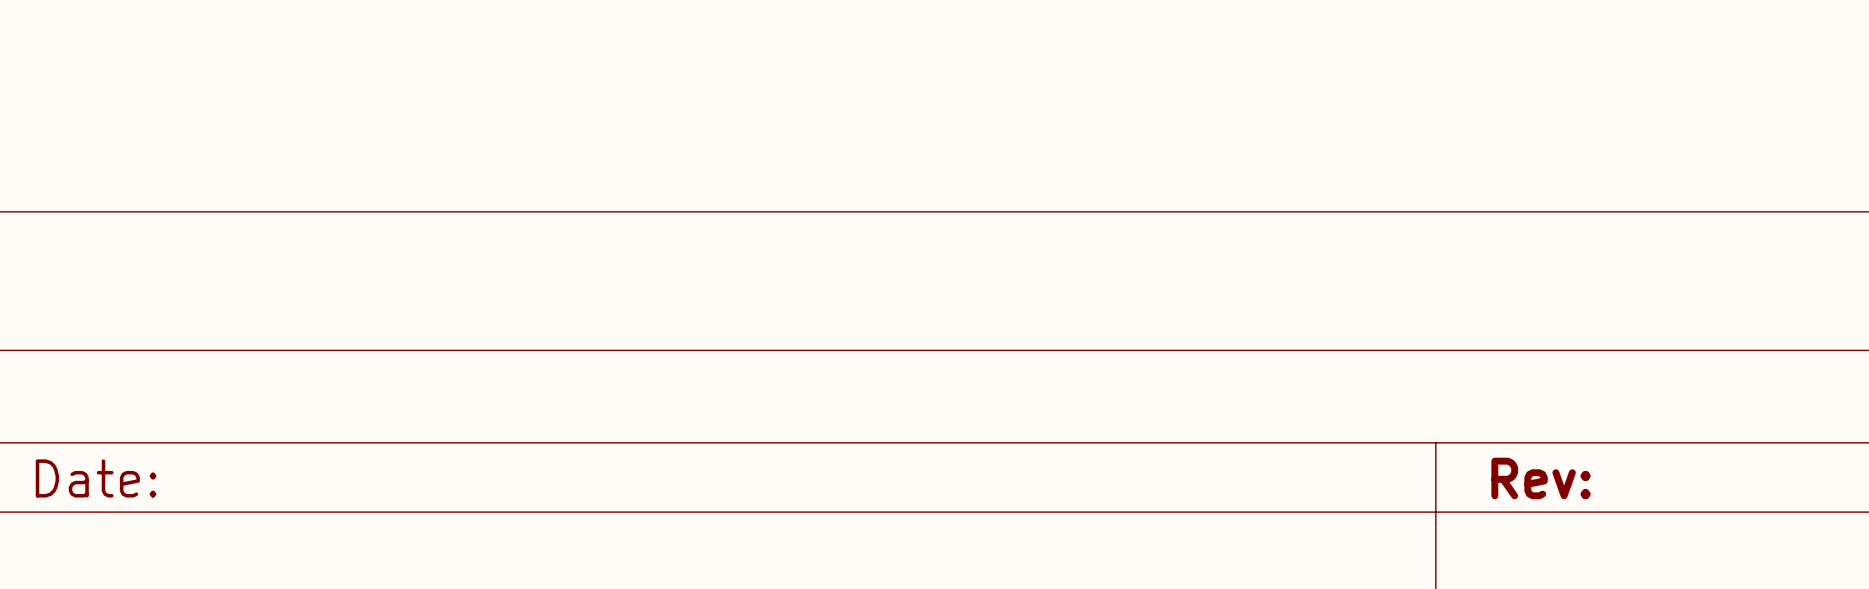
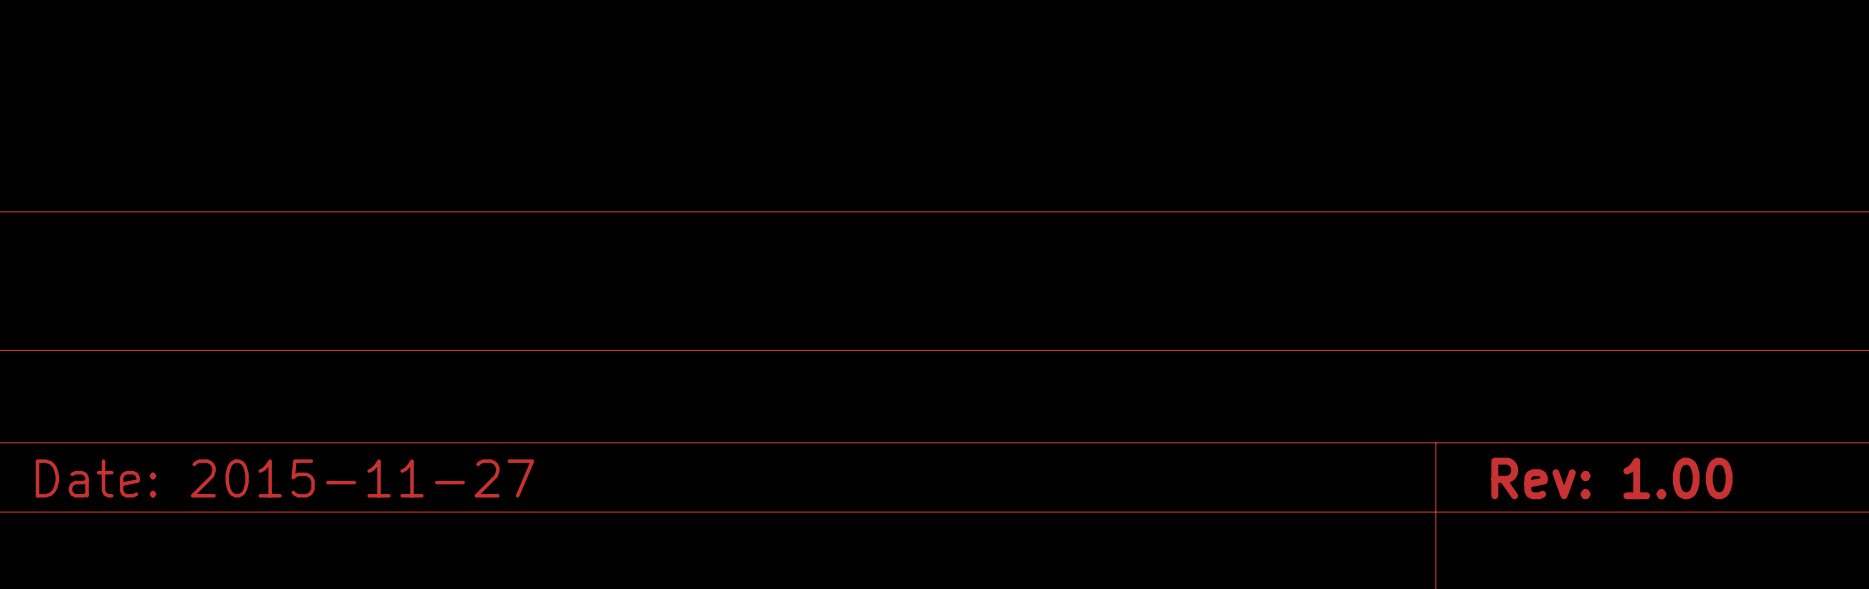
title block: Date: (96, 478) -> Date: 2015-11-27 (284, 478)
title block: Rev: (1541, 478) -> Rev: 1.00 (1611, 478)

